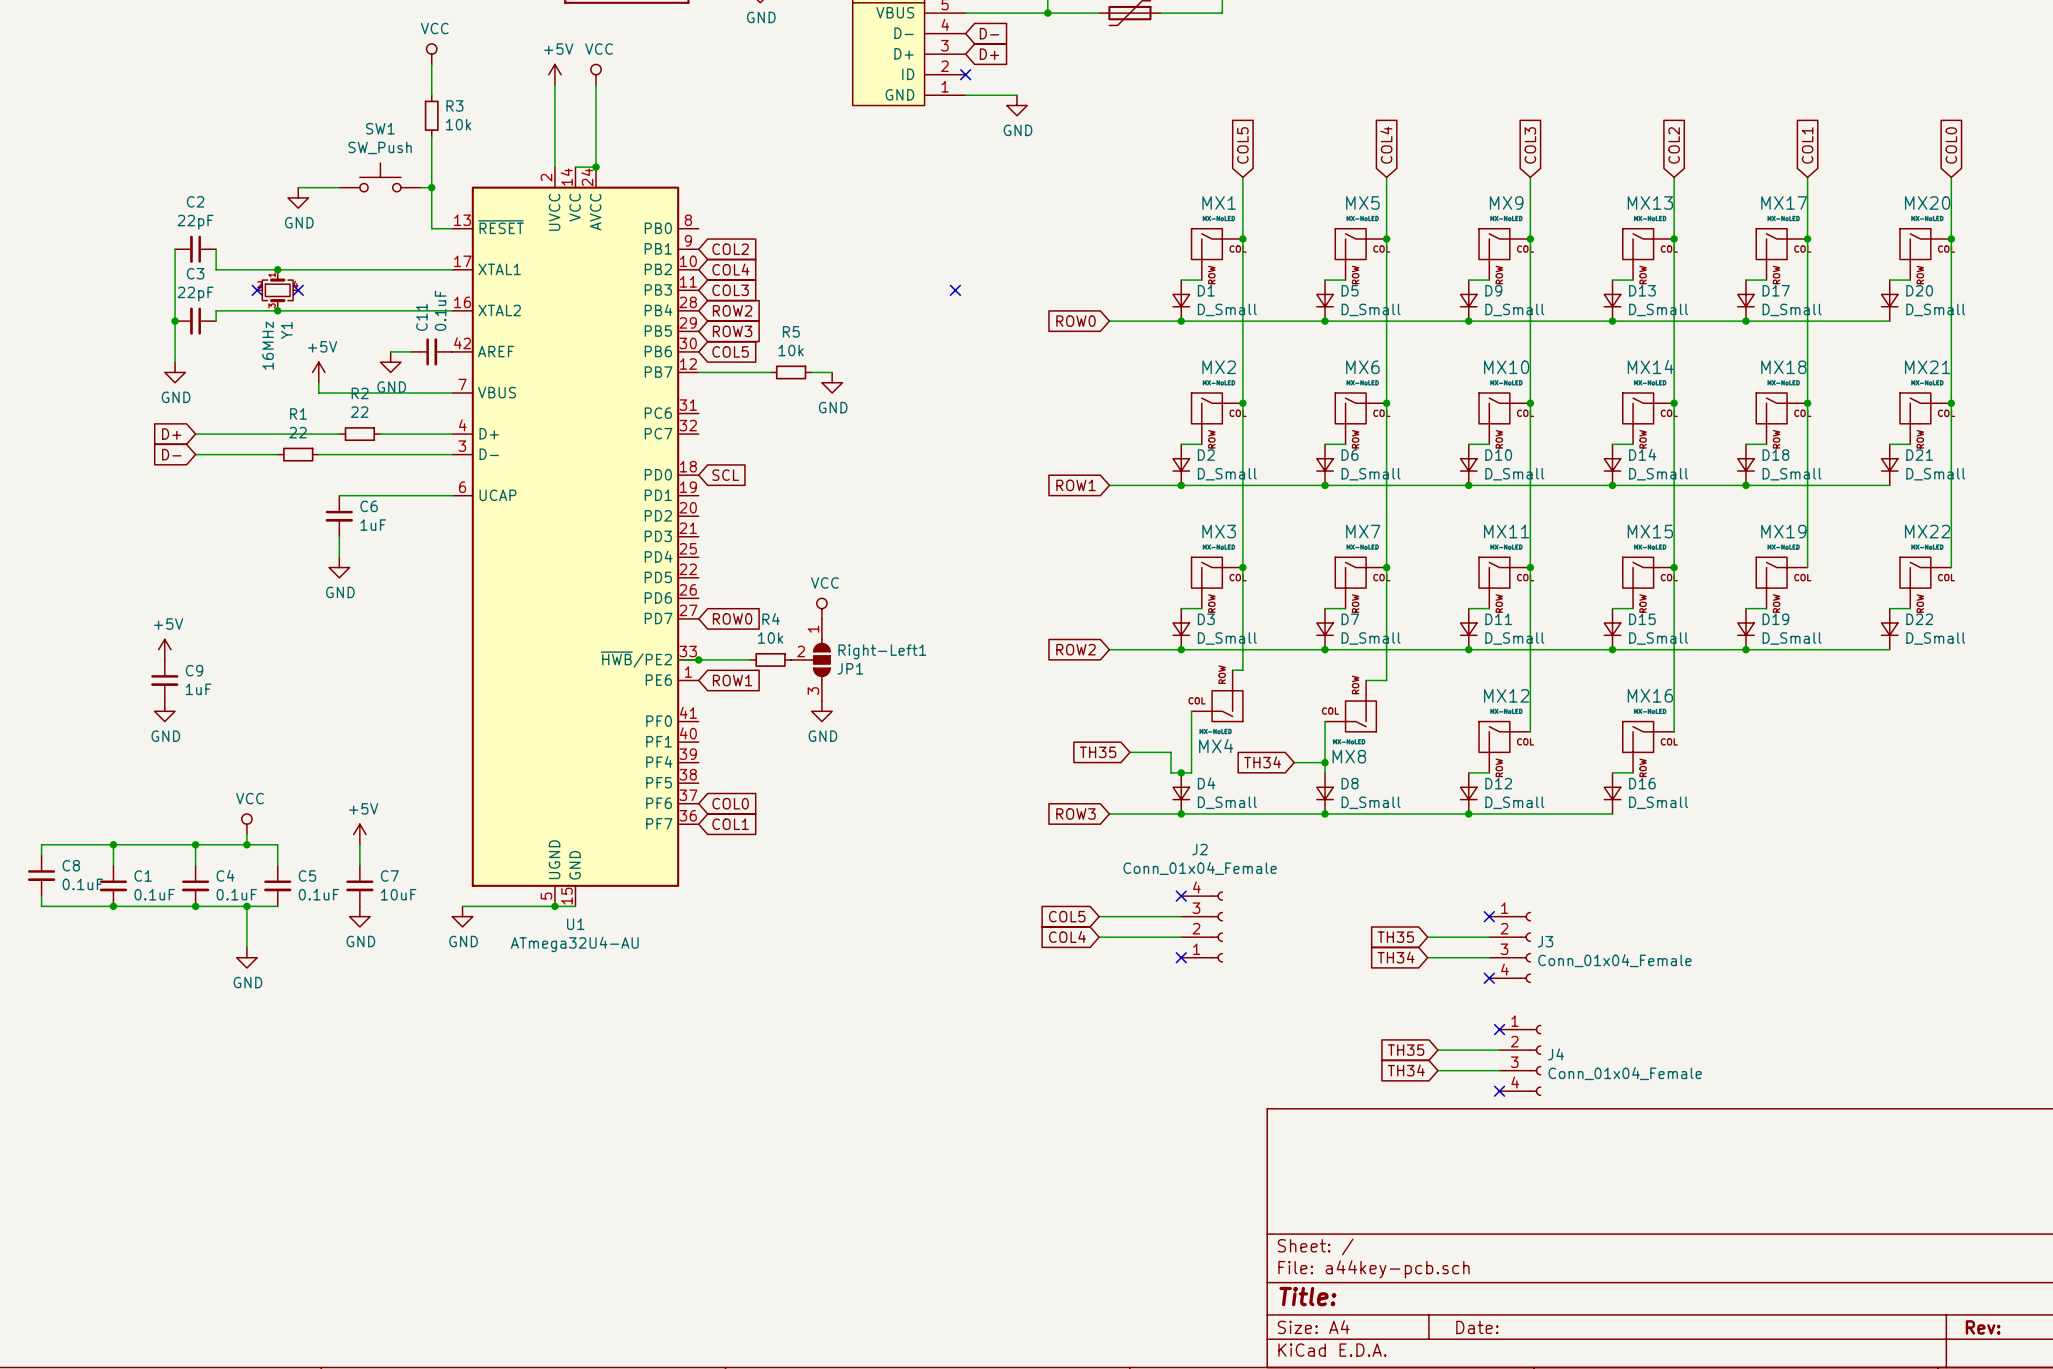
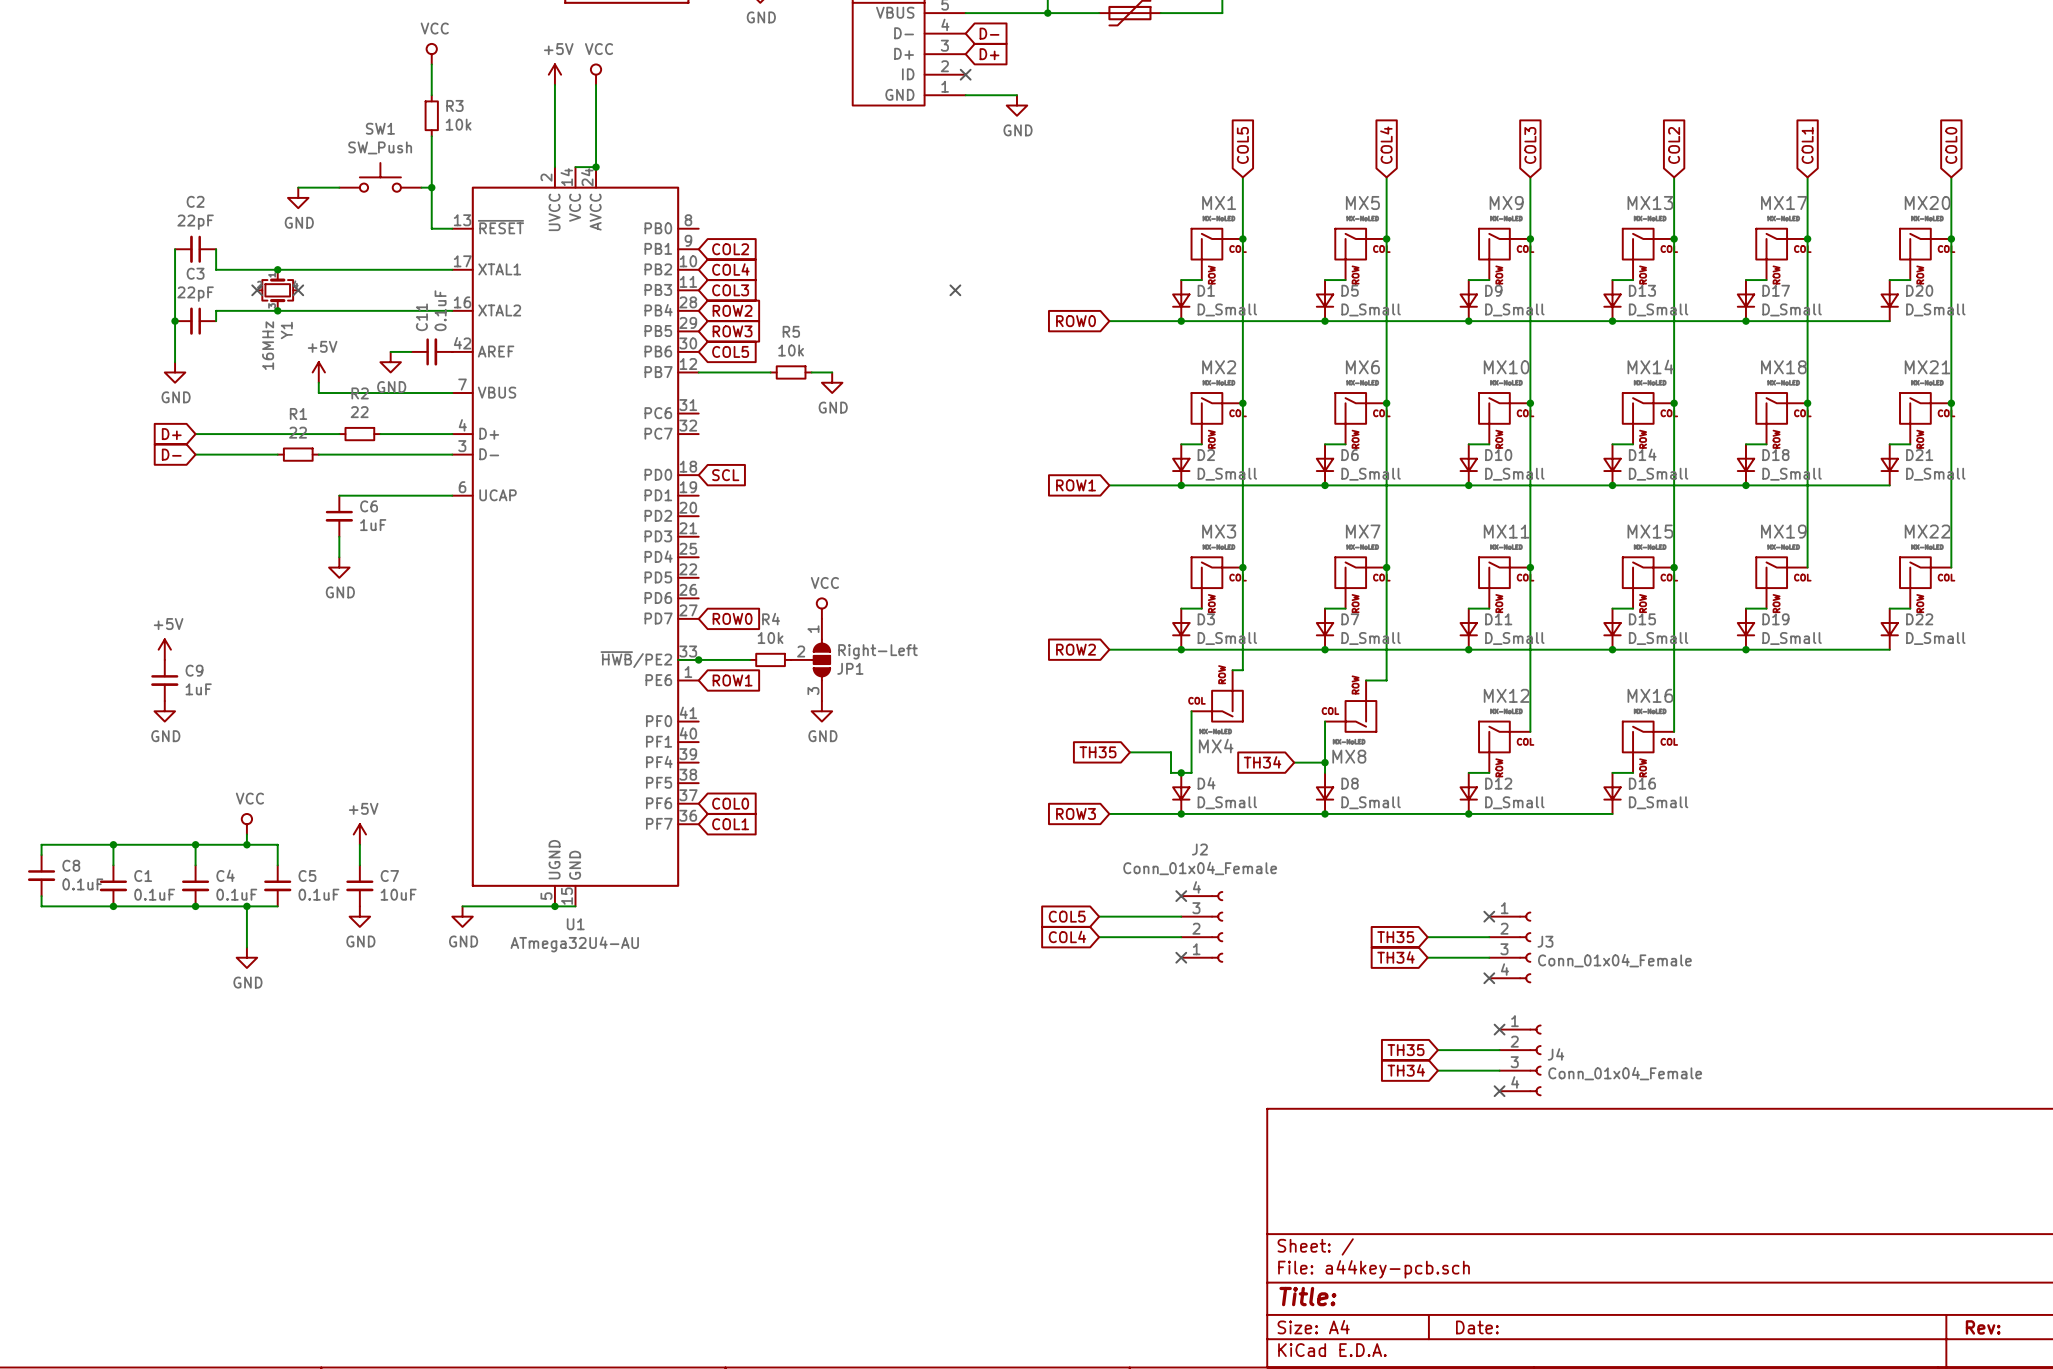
Right-Left1 name: Right-Left1 (882, 651) -> Right-Left (877, 651)

